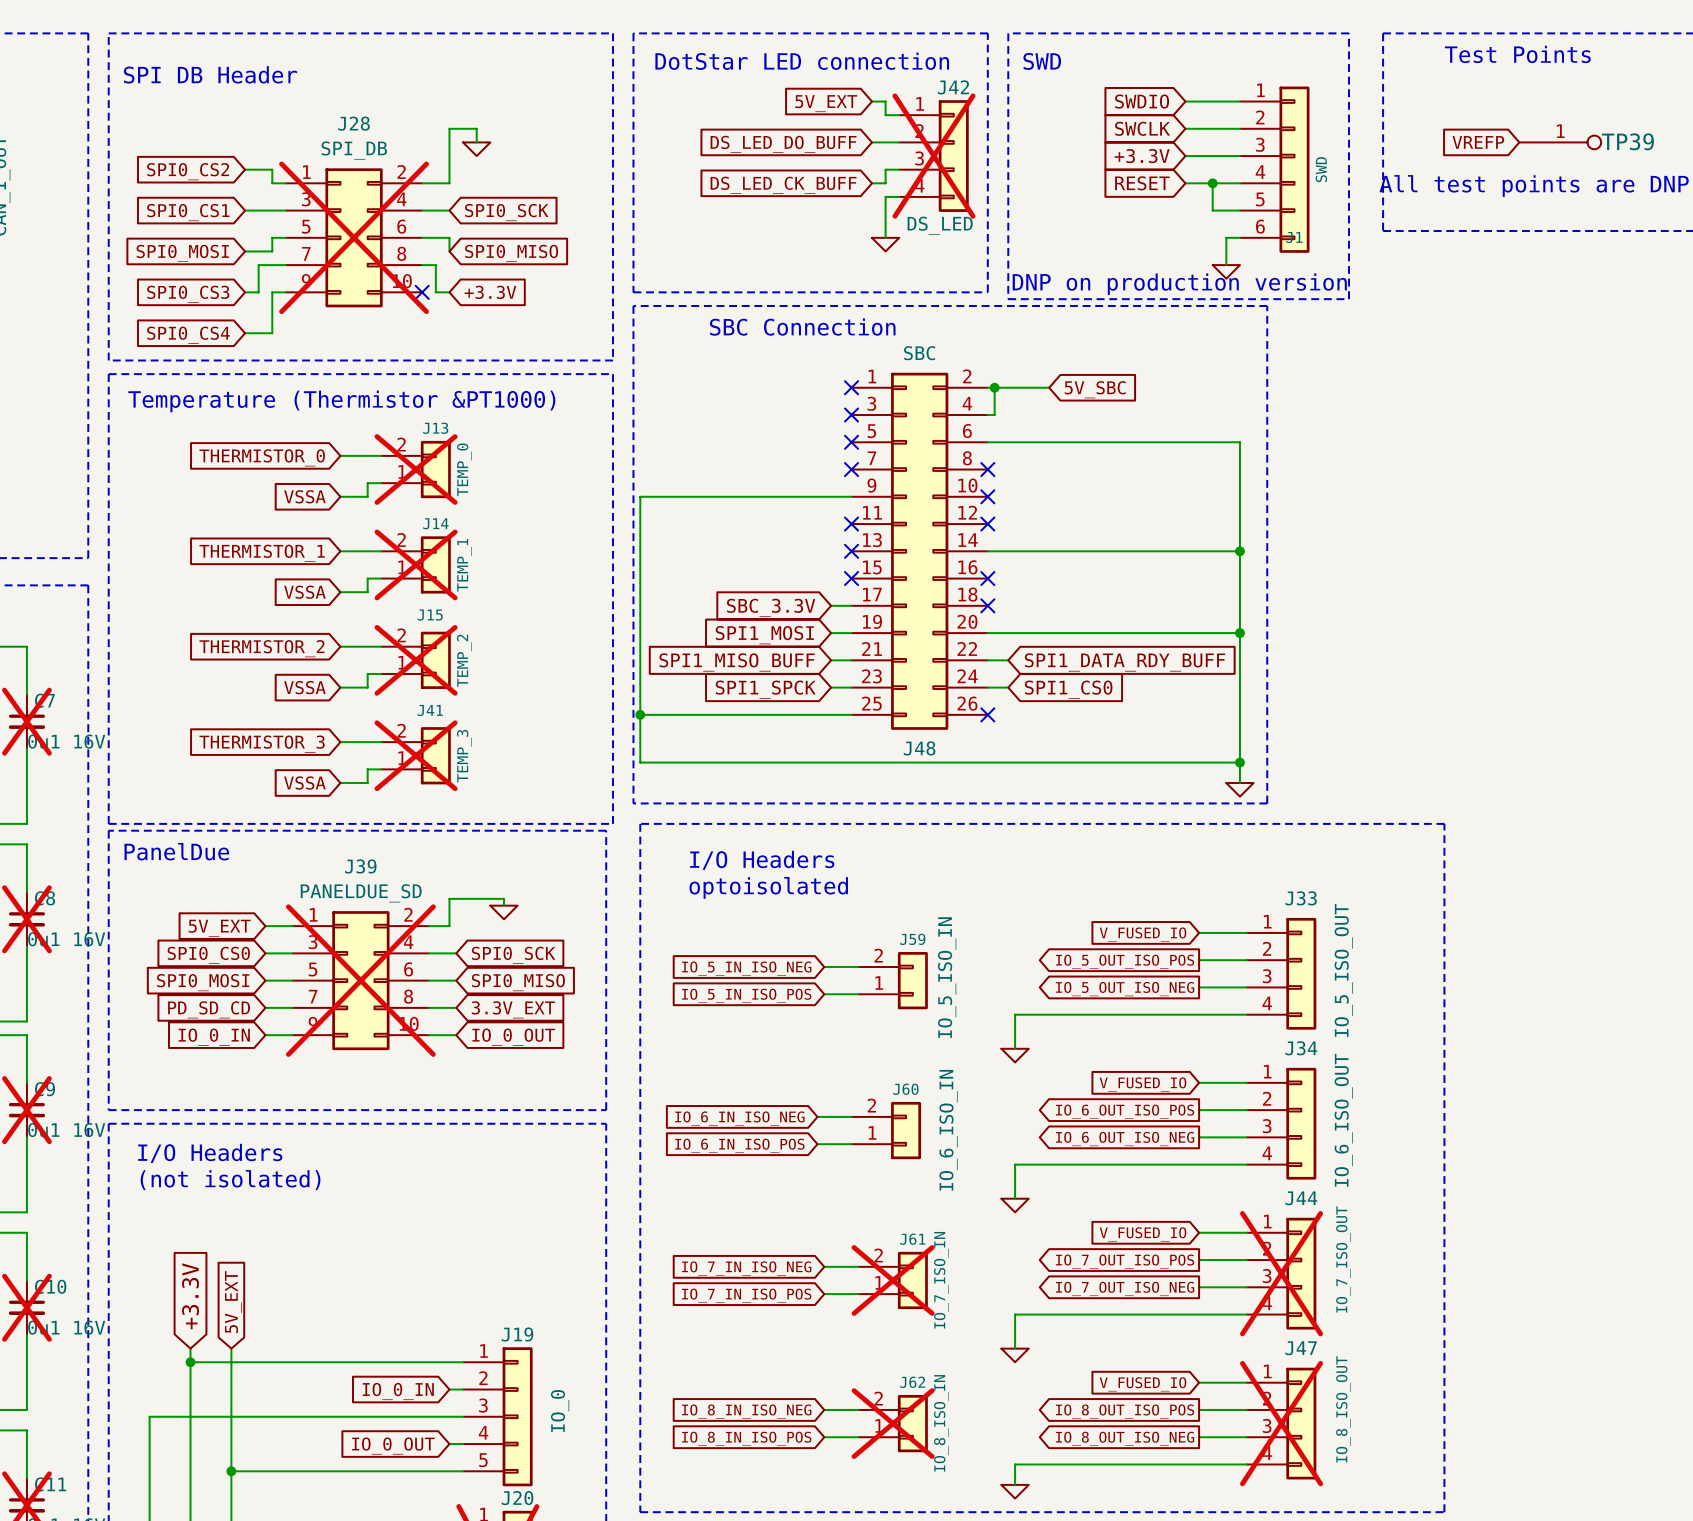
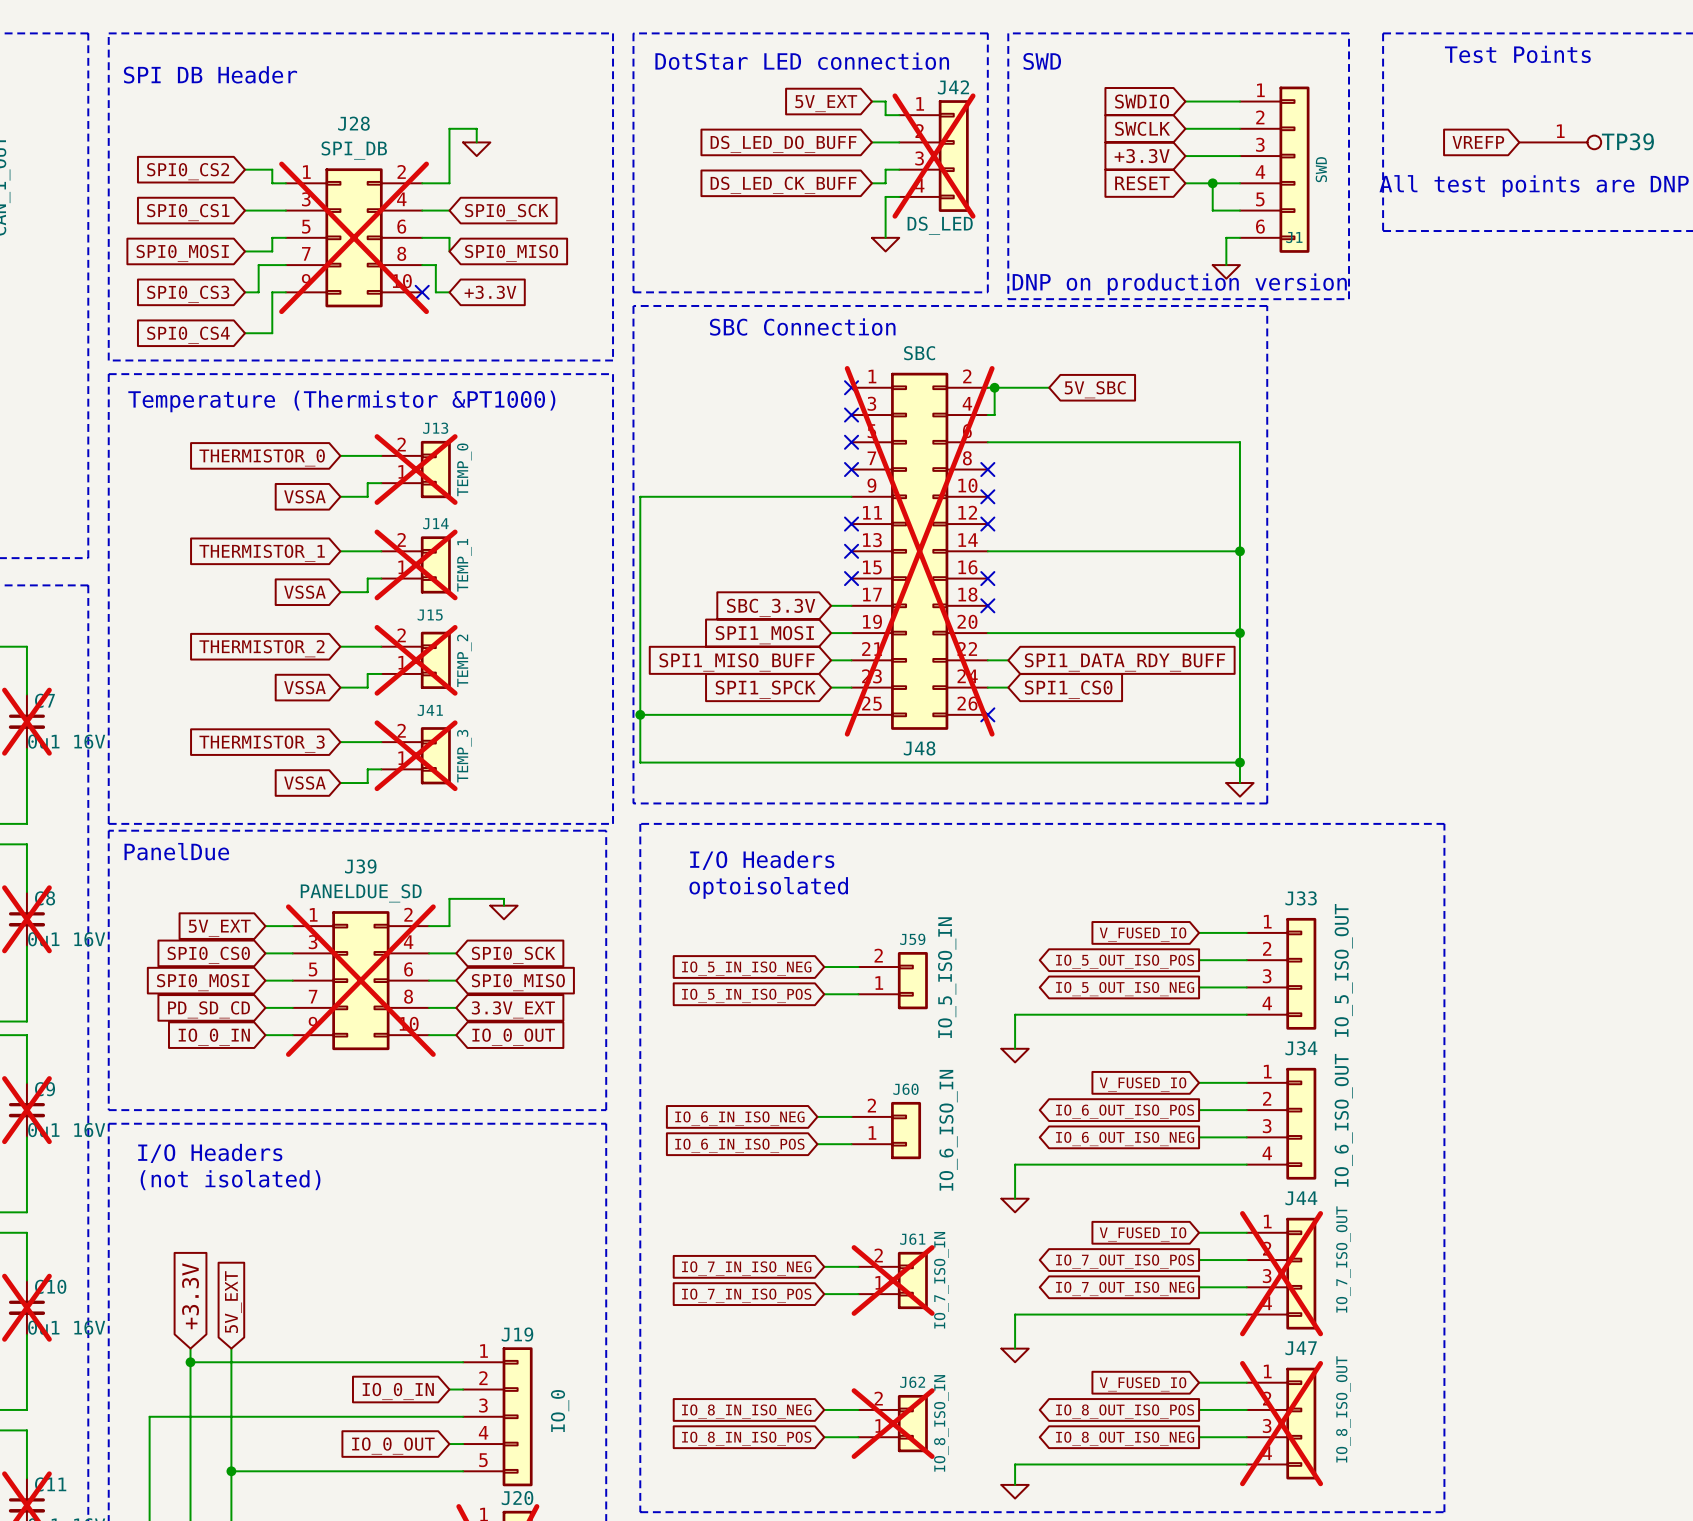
J48 do-not-place cross: none -> (919, 551)

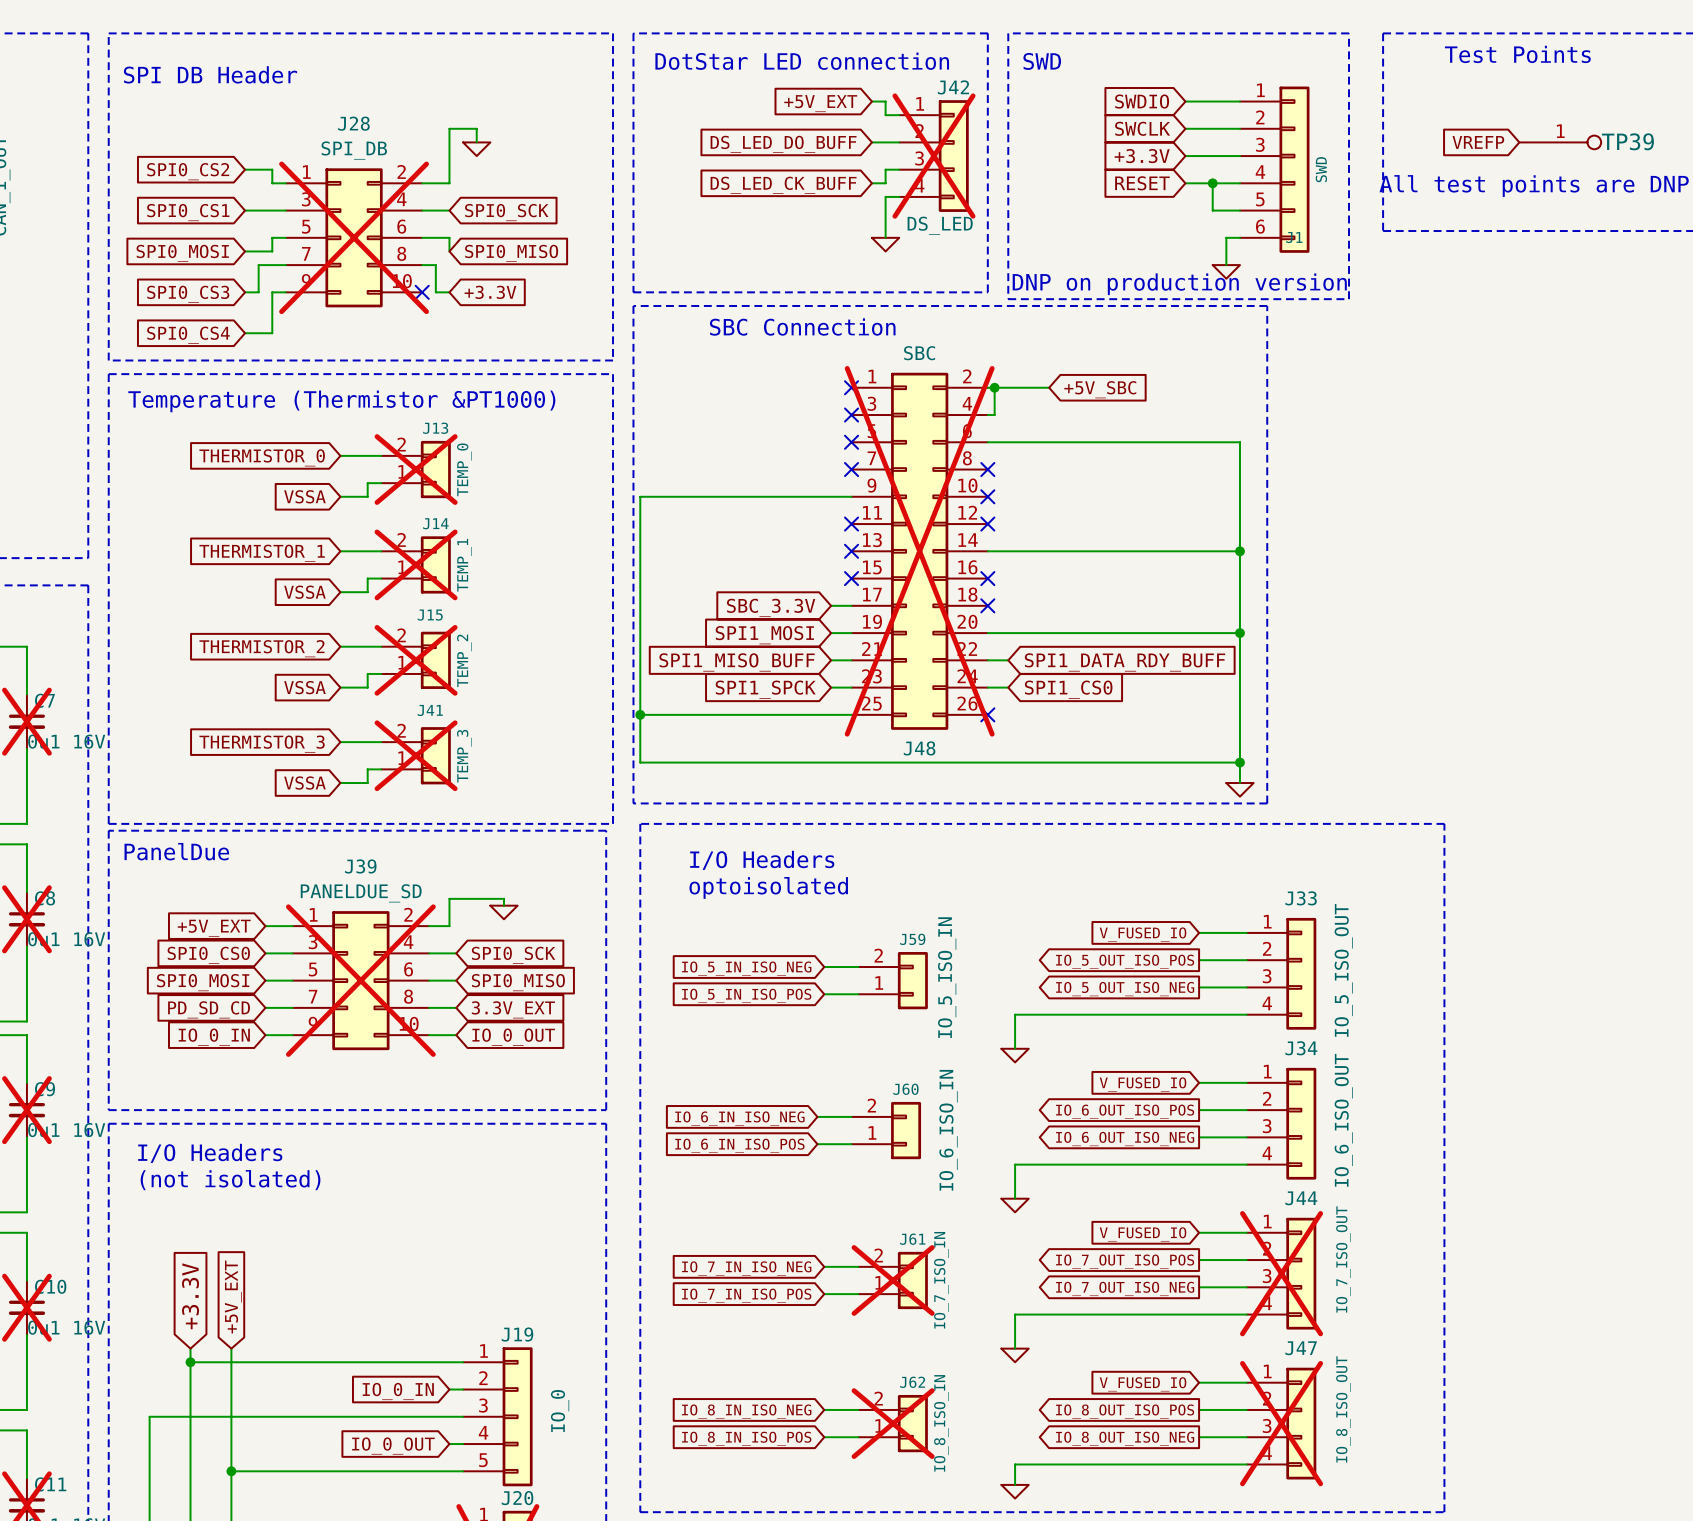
global label: 5V_EXT (826, 103) -> +5V_EXT (820, 103)
global label: 5V_SBC (1095, 389) -> +5V_SBC (1100, 389)
global label: 5V_EXT (219, 928) -> +5V_EXT (214, 928)
global label: 5V_EXT (233, 1302) -> +5V_EXT (233, 1297)

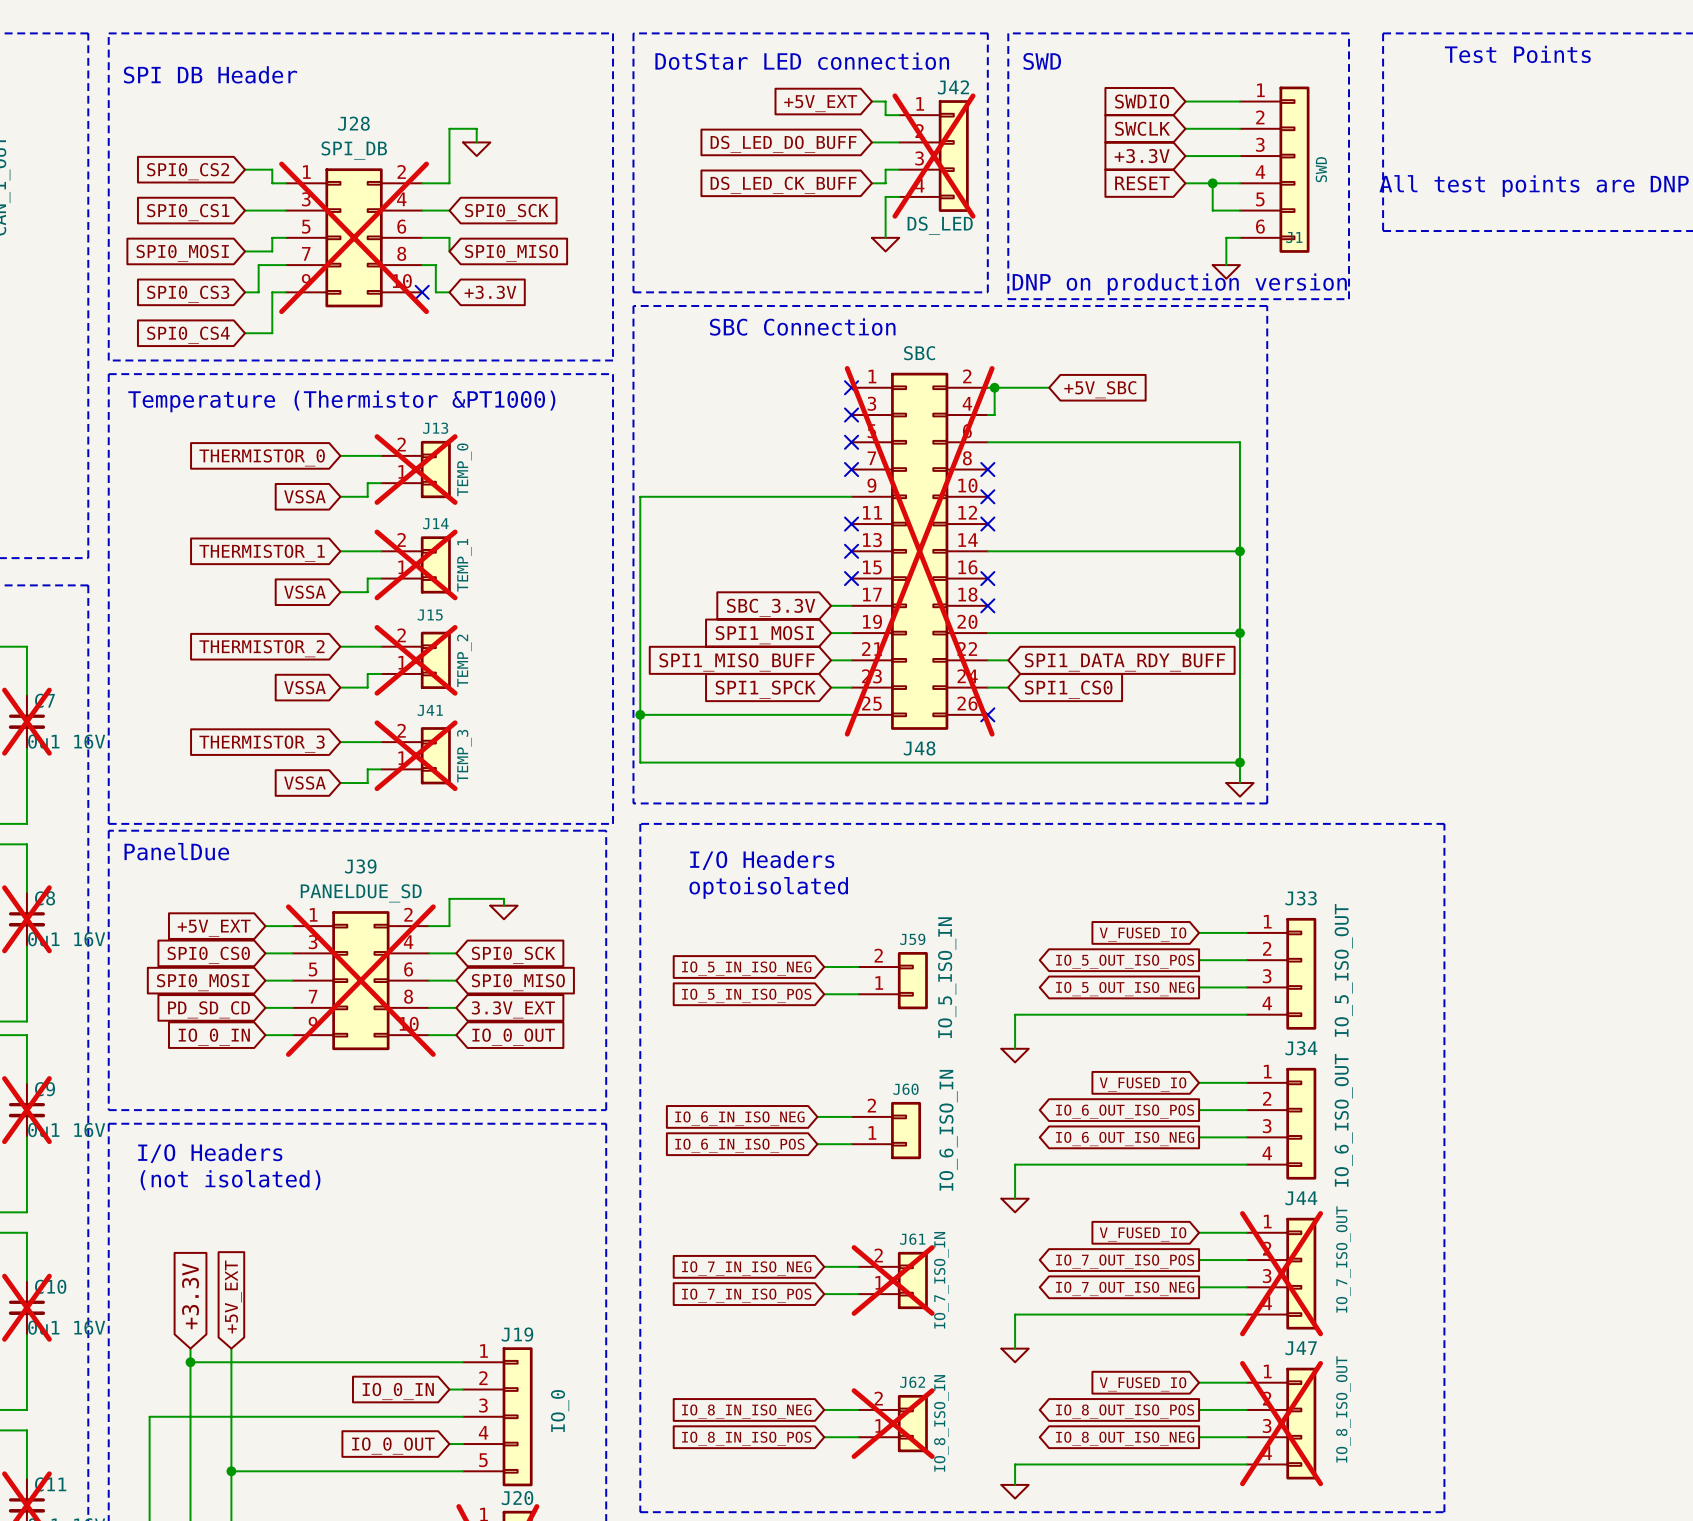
global label: VREFP (1478, 142) -> none
TP39: (1560, 142) -> none

